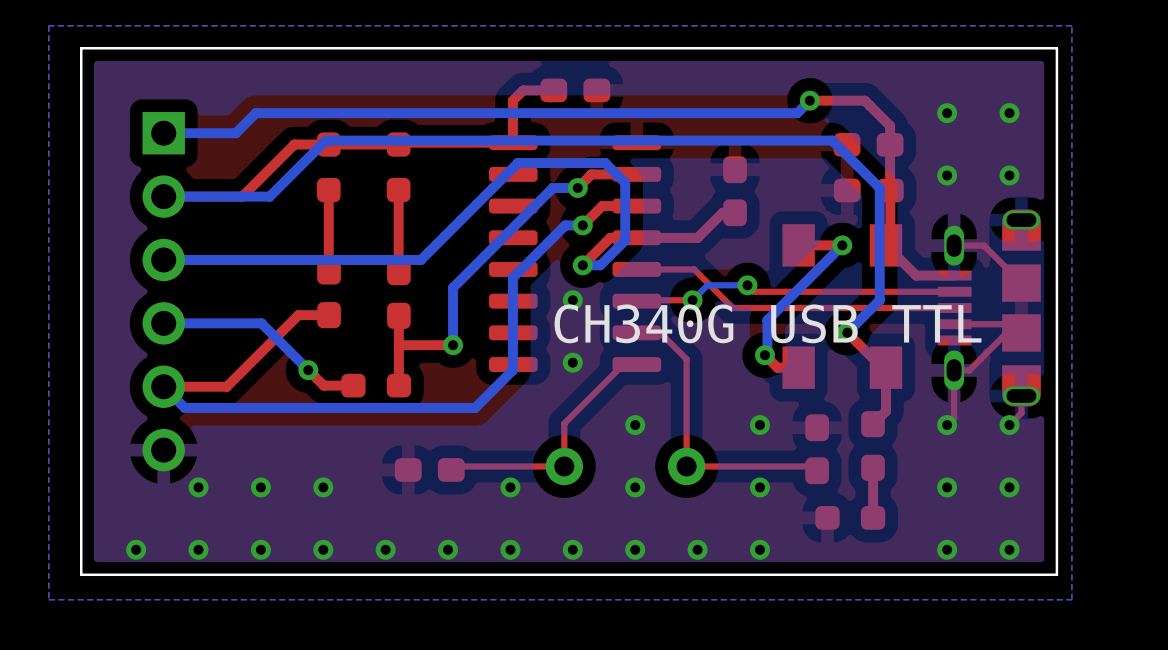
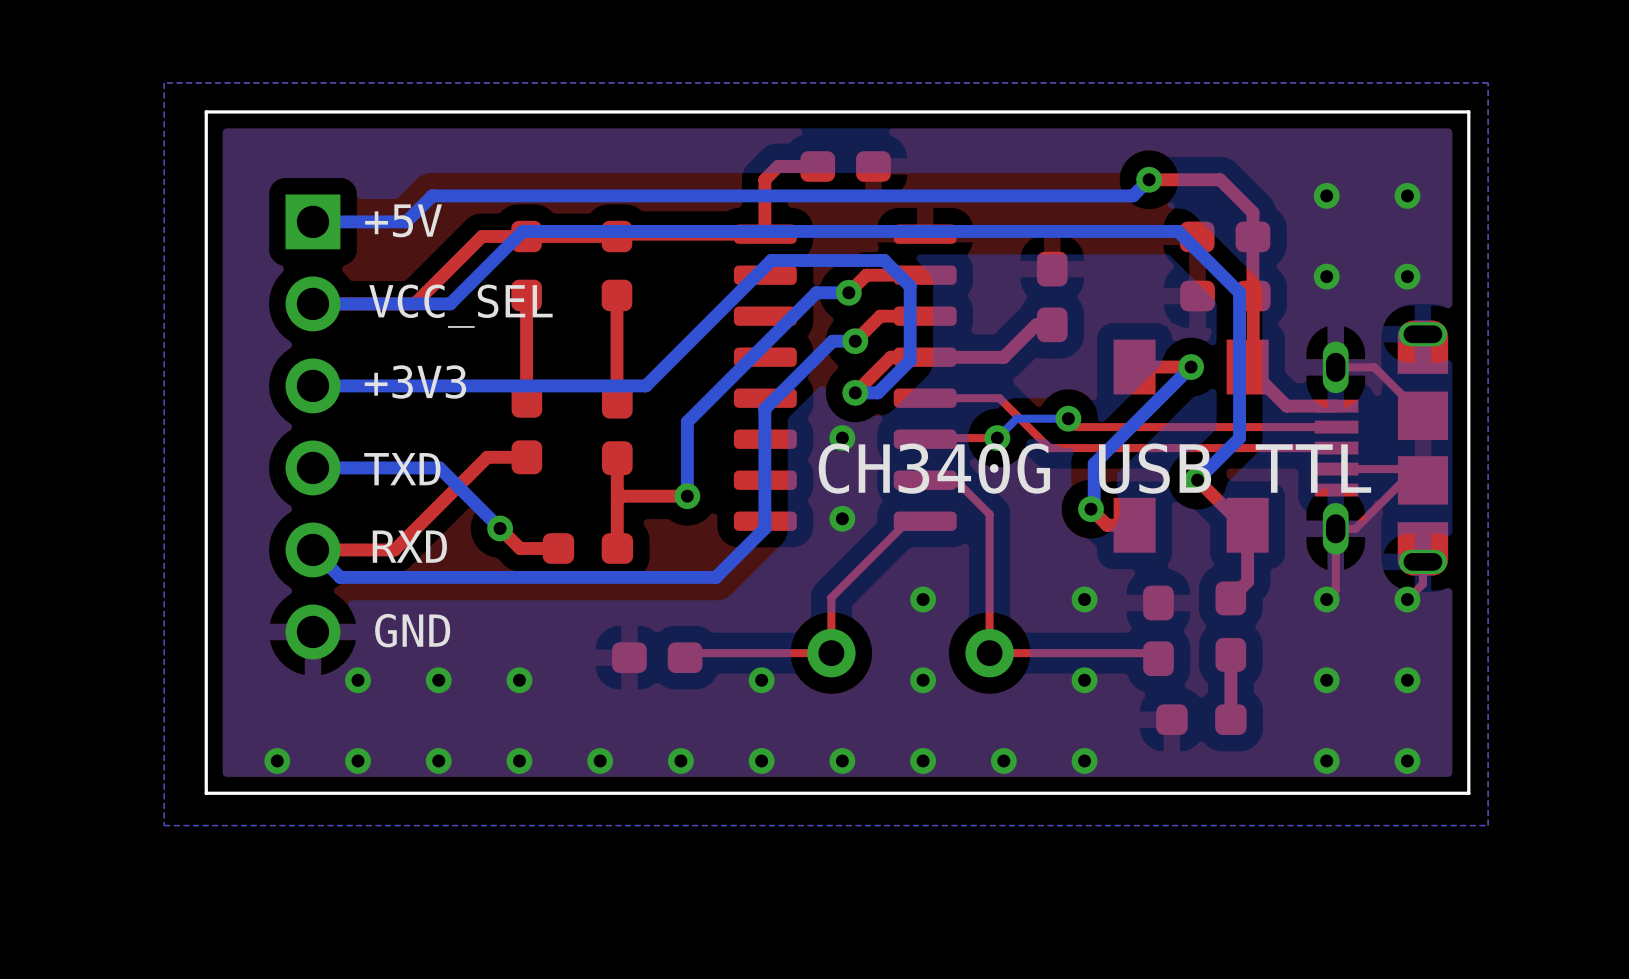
text: none -> +5V (403, 220)
text: none -> VCC_SEL (460, 306)
text: none -> +3V3 (415, 382)
text: none -> TXD (402, 469)
text: none -> RXD (409, 546)
text: none -> GND (412, 630)

